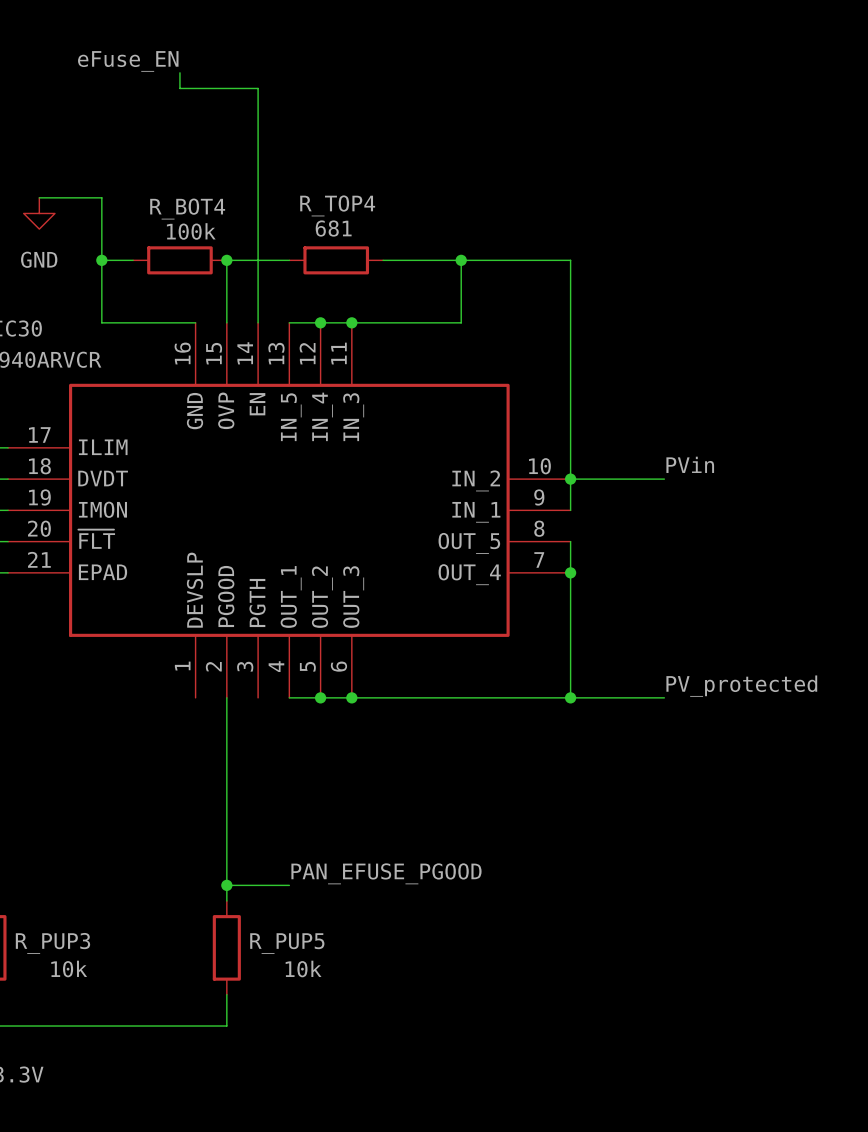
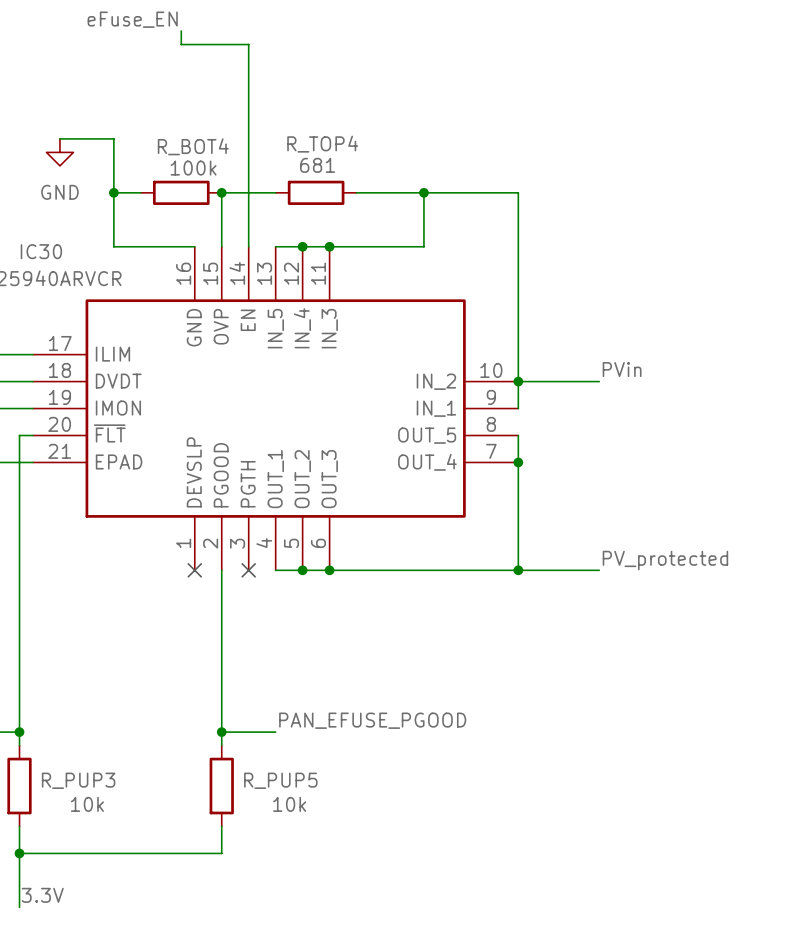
no-connect mark: none -> (194, 570)
no-connect mark: none -> (248, 570)

